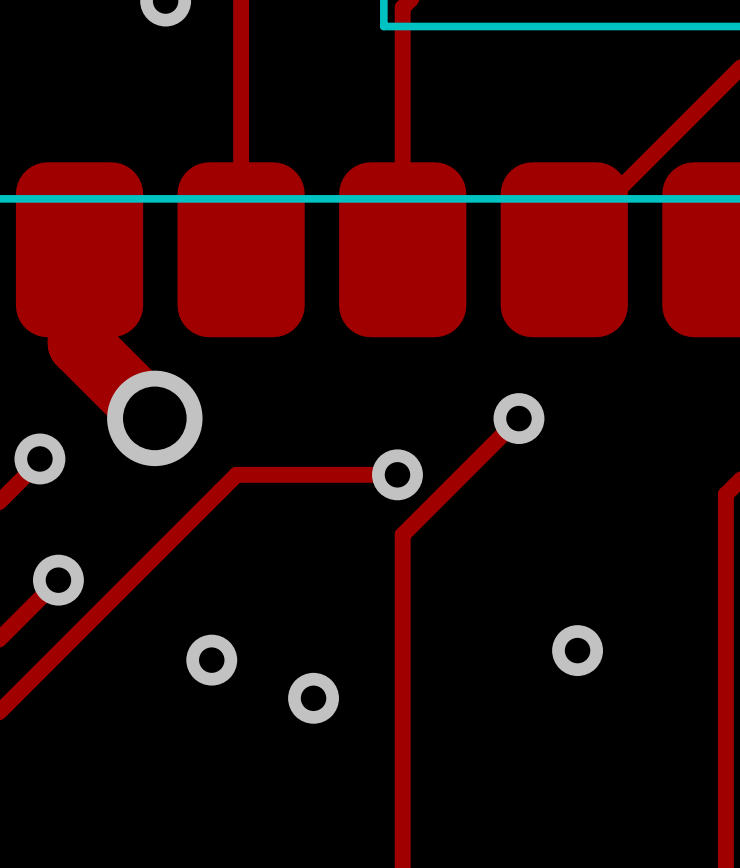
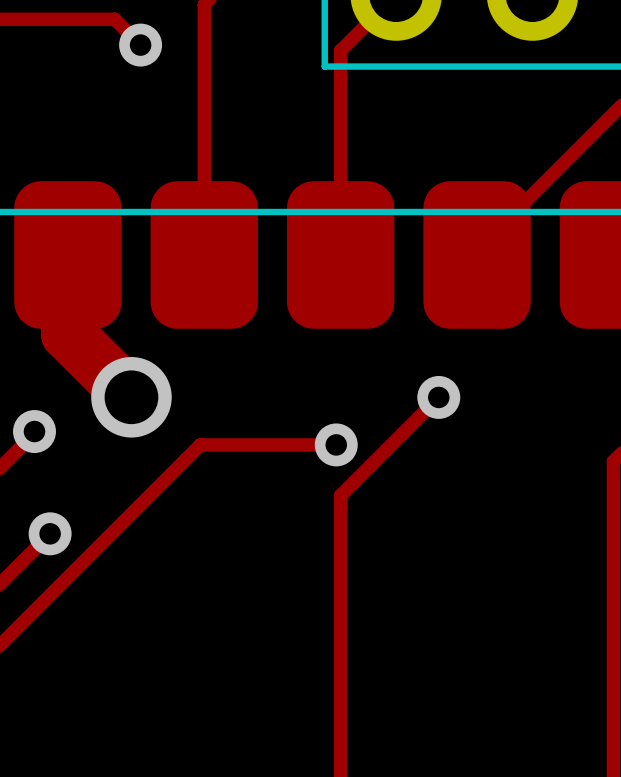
via: (577, 650) -> none
via: (211, 660) -> none
via: (313, 698) -> none

